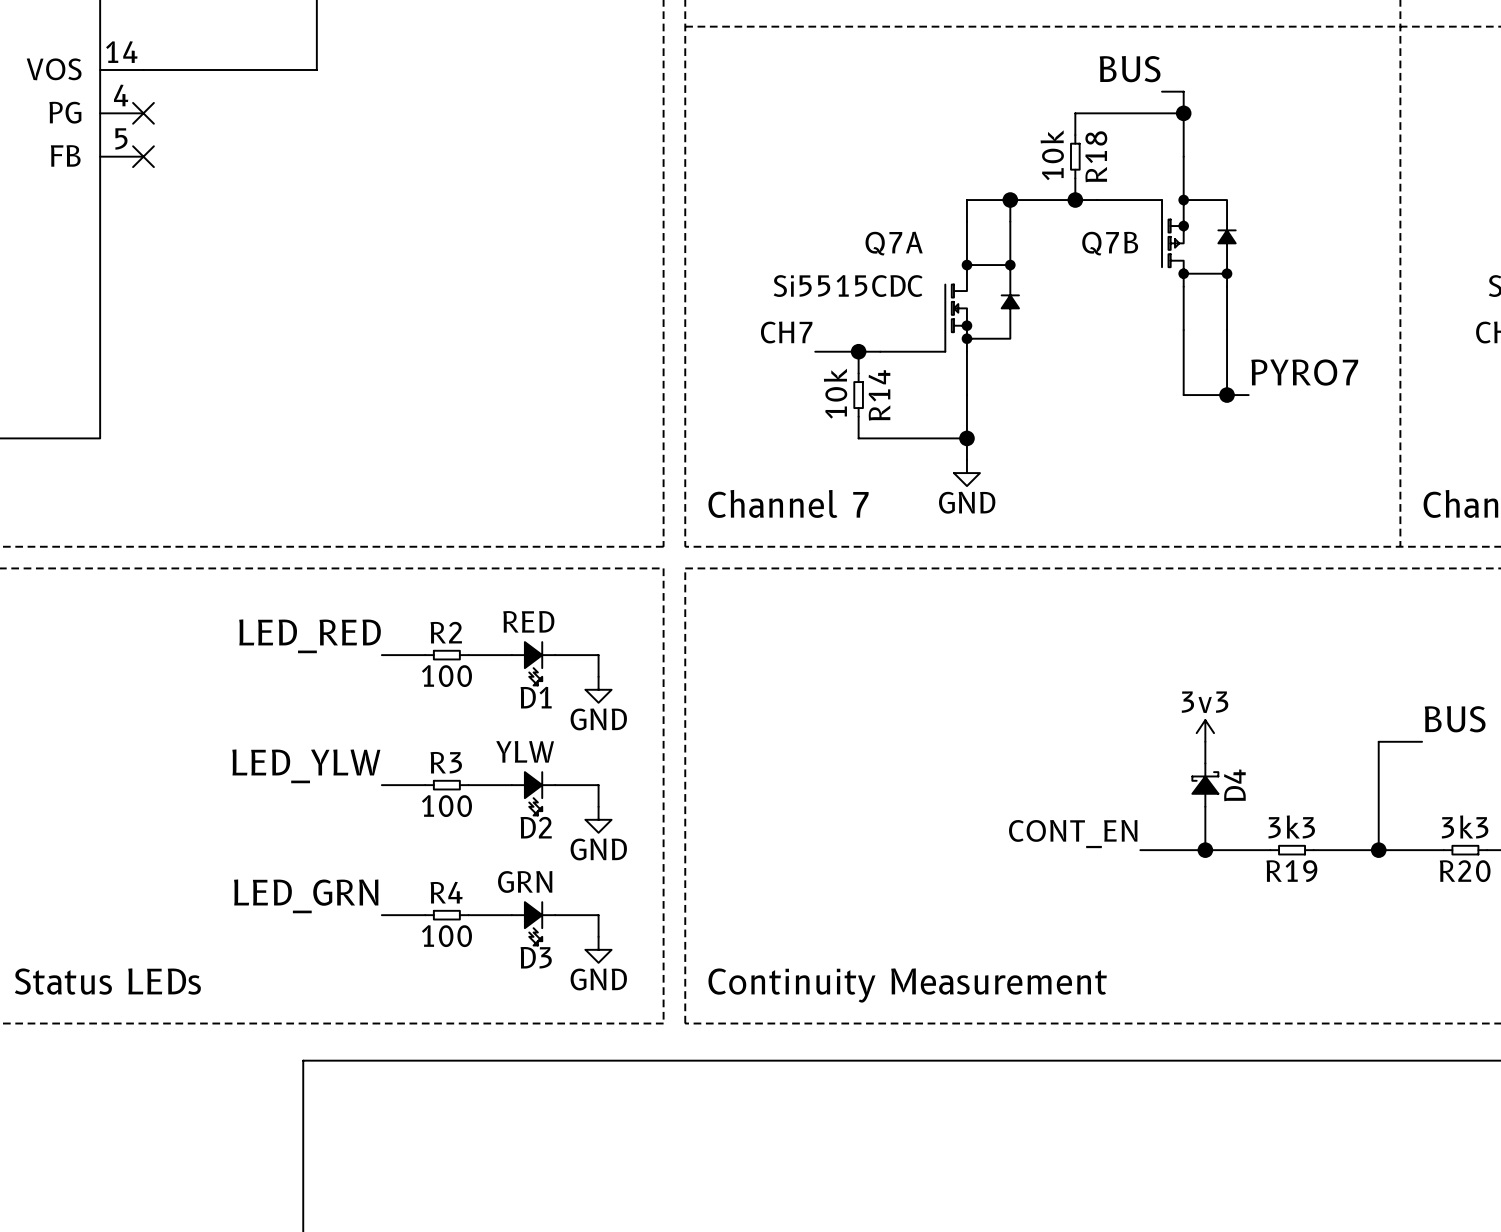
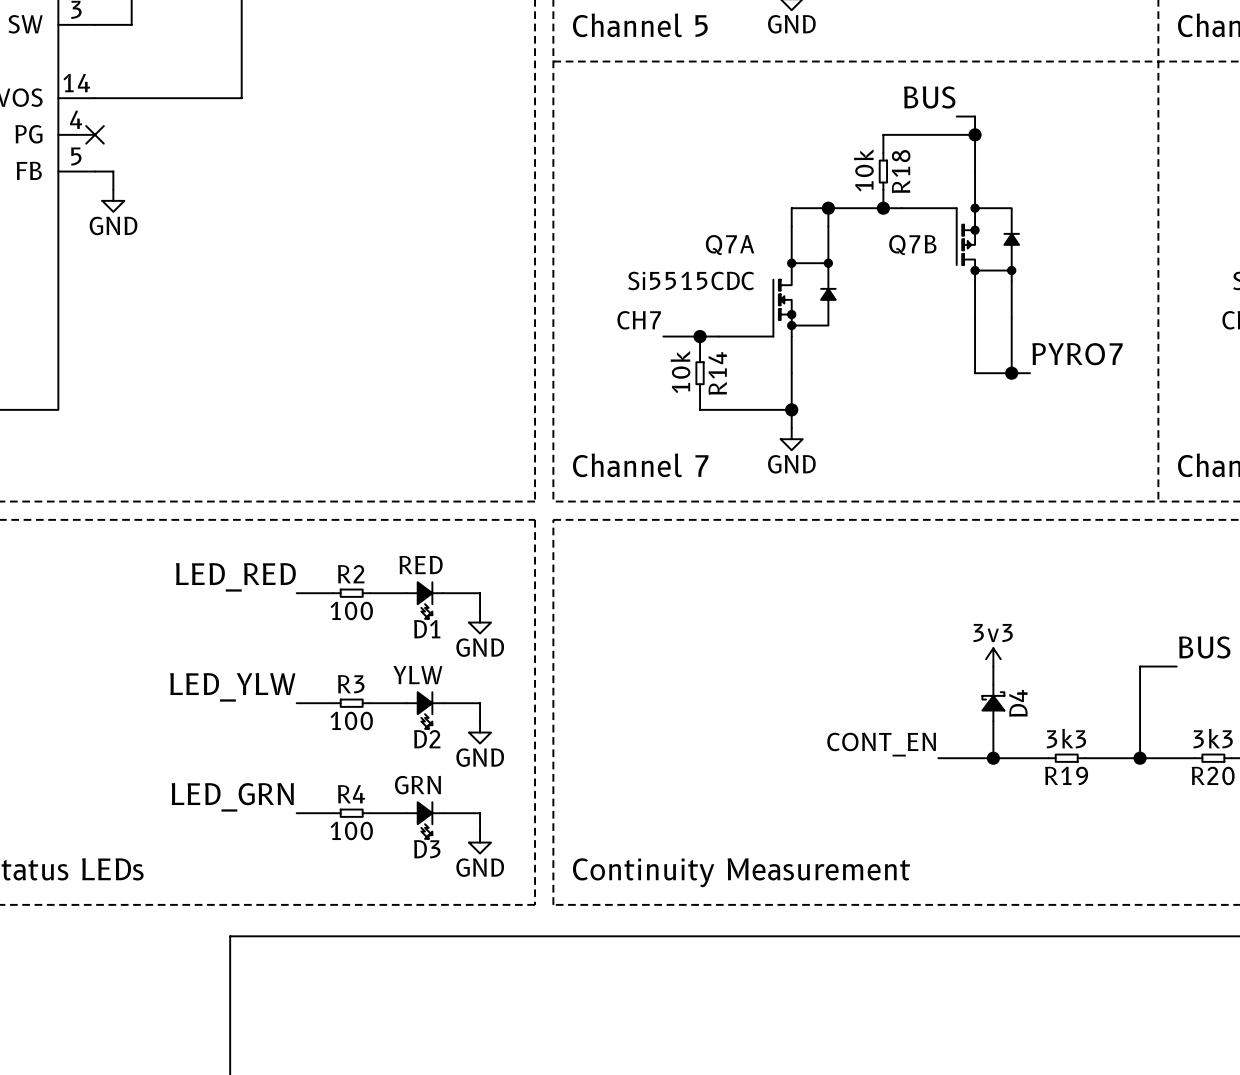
wire: none -> (95, 171) (113, 171) (113, 189)
no-connect mark: (143, 156) -> none
power symbol: none -> GND (113, 200)

